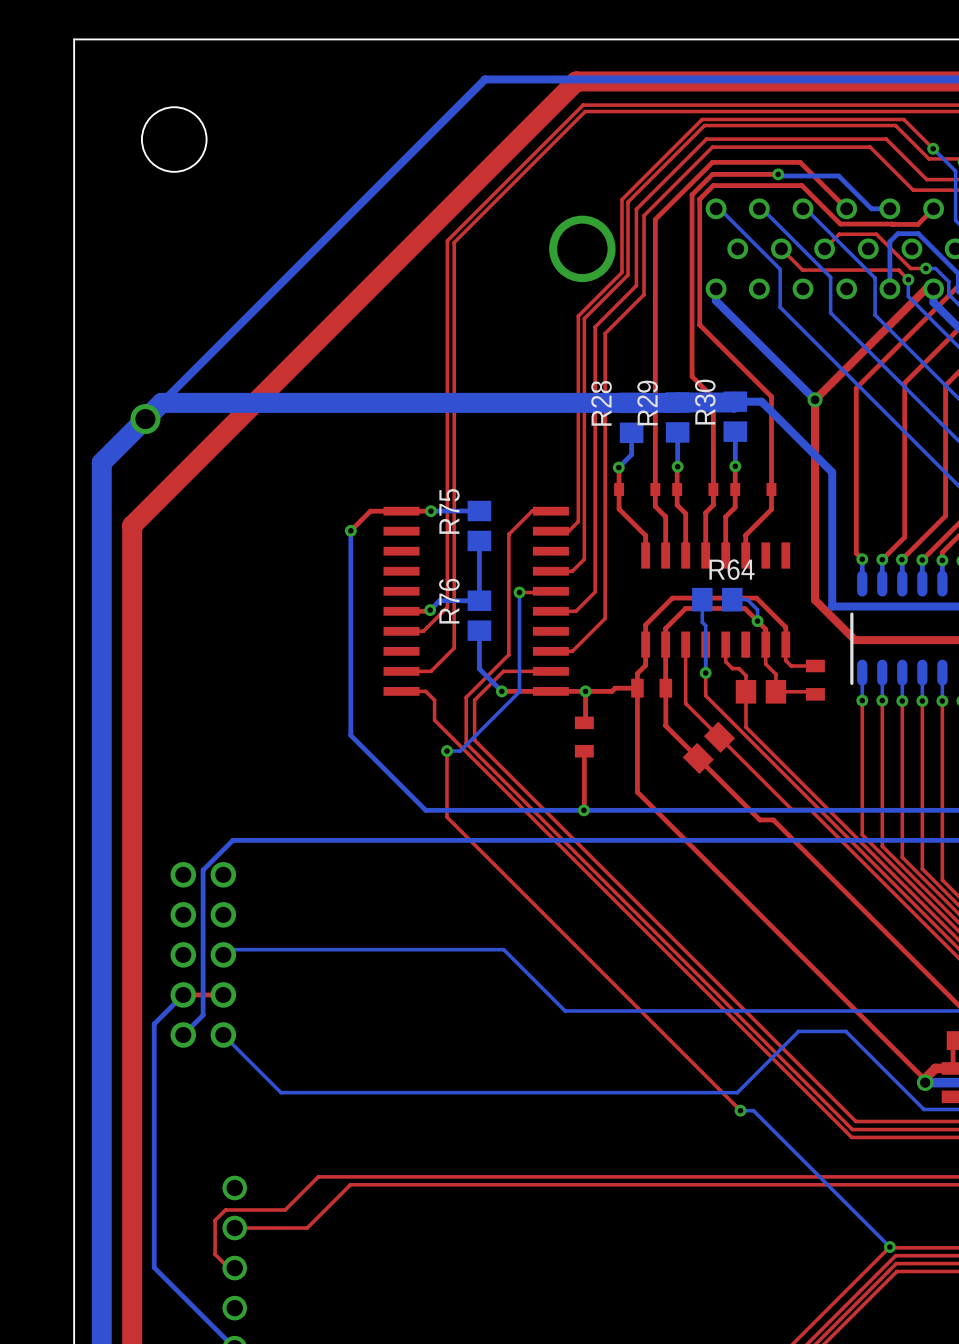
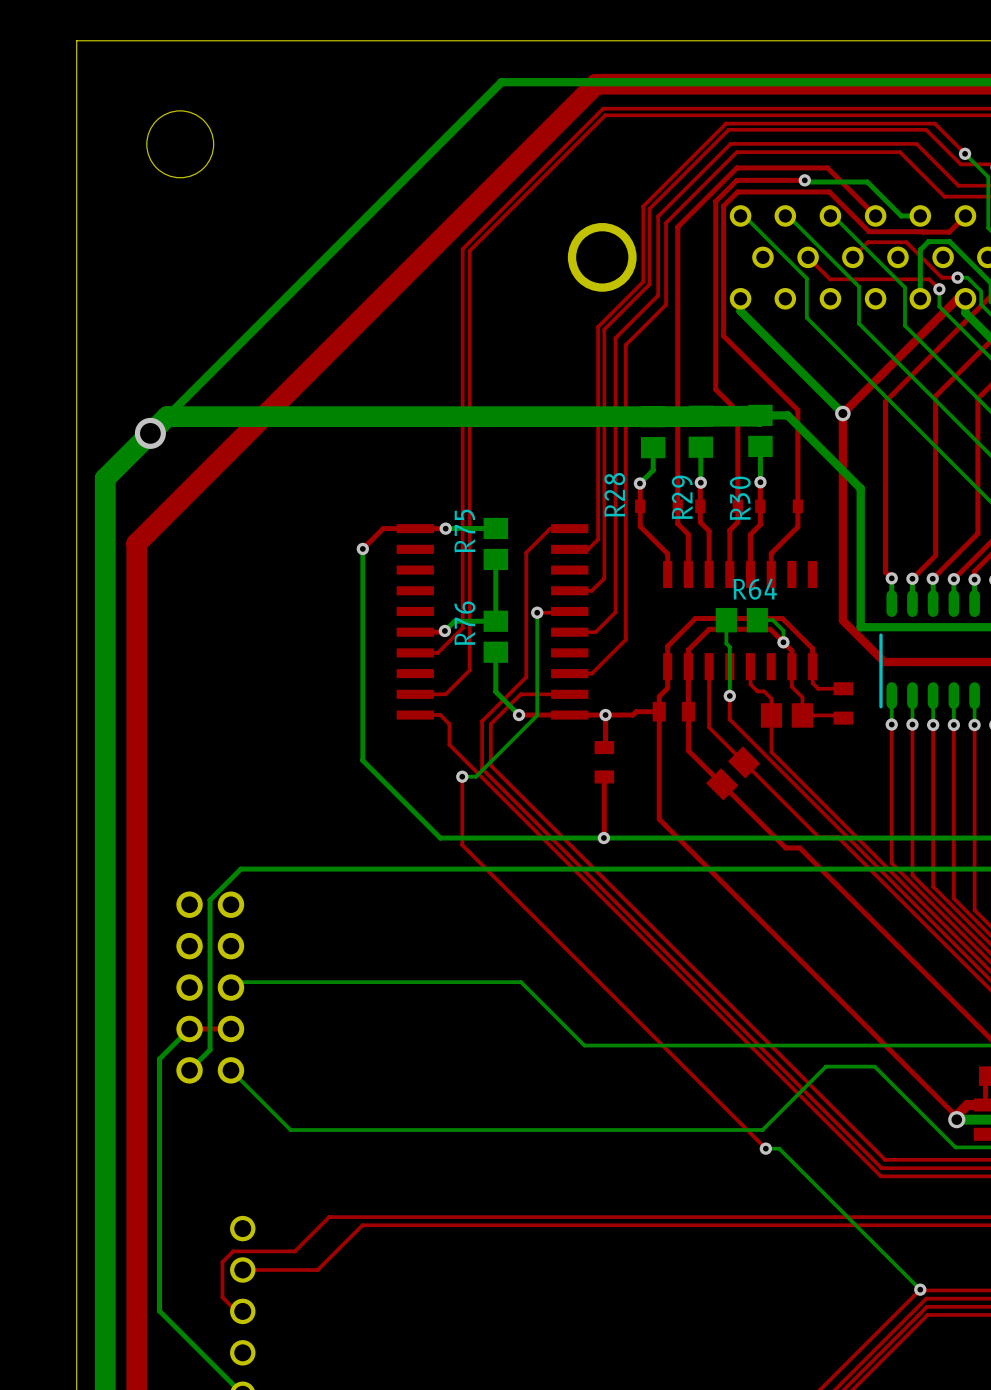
R29 name position: R29 (647, 402) -> R29 (682, 497)
R30 name position: R30 (705, 402) -> R30 (740, 498)
R28 name position: R28 (601, 403) -> R28 (614, 494)

